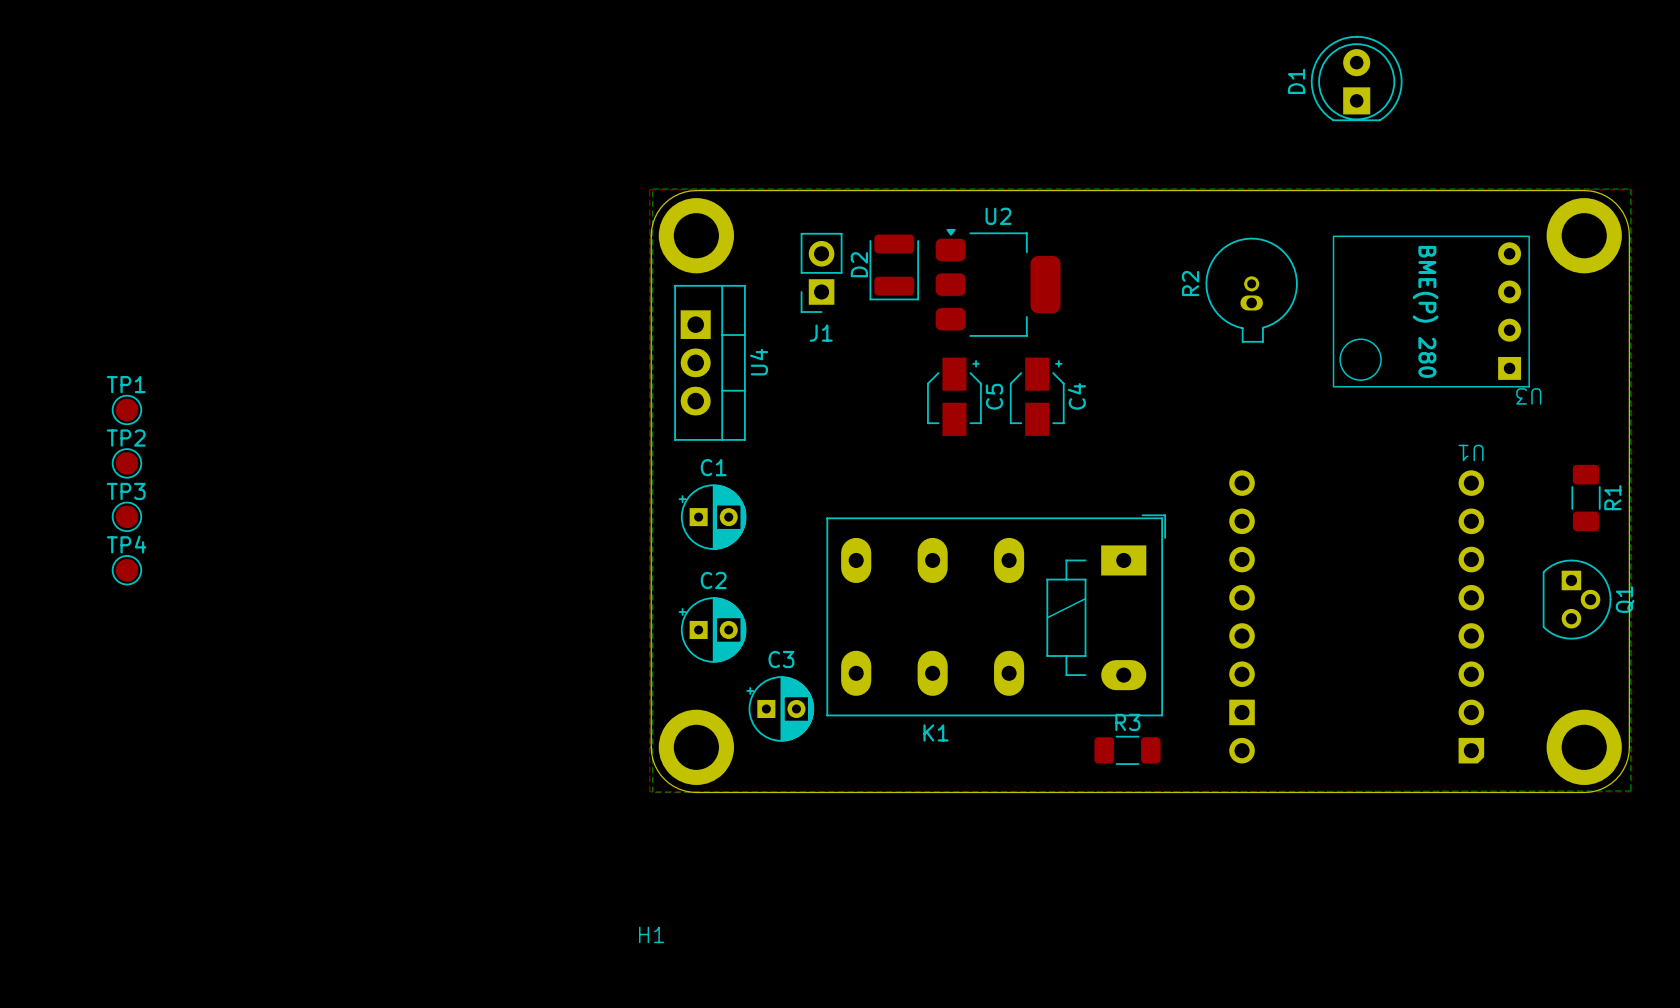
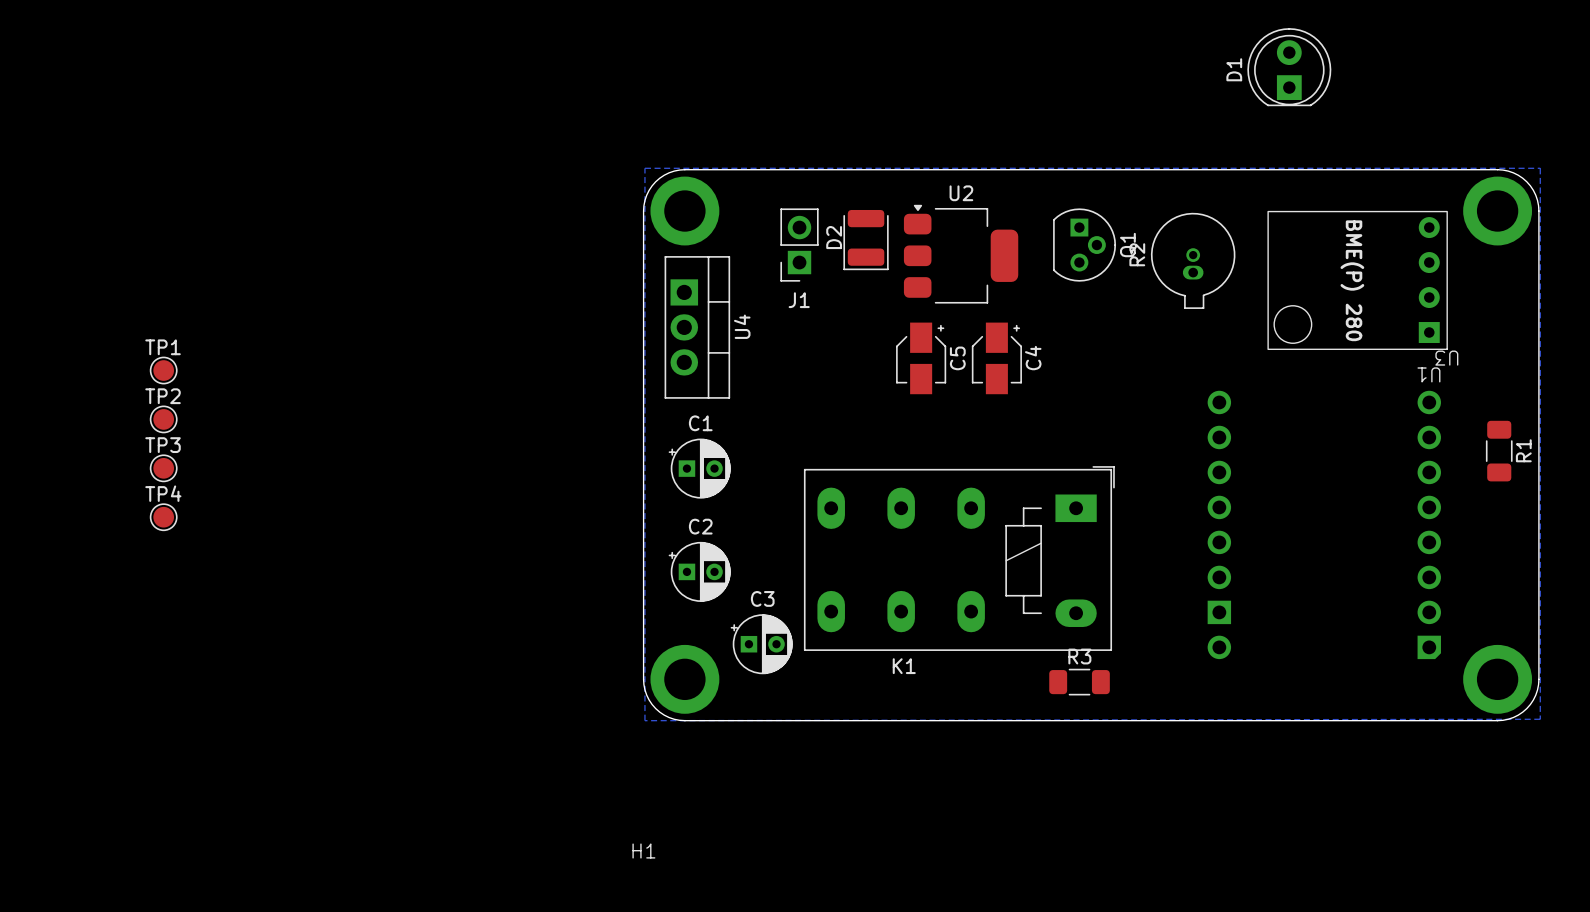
top zone outline: (649, 189) (1631, 189) (1631, 791) (649, 791) (649, 189) -> none
Q1 position: (1577, 599) -> (1084, 245)
U1 position: (1356, 616) -> (1324, 524)

